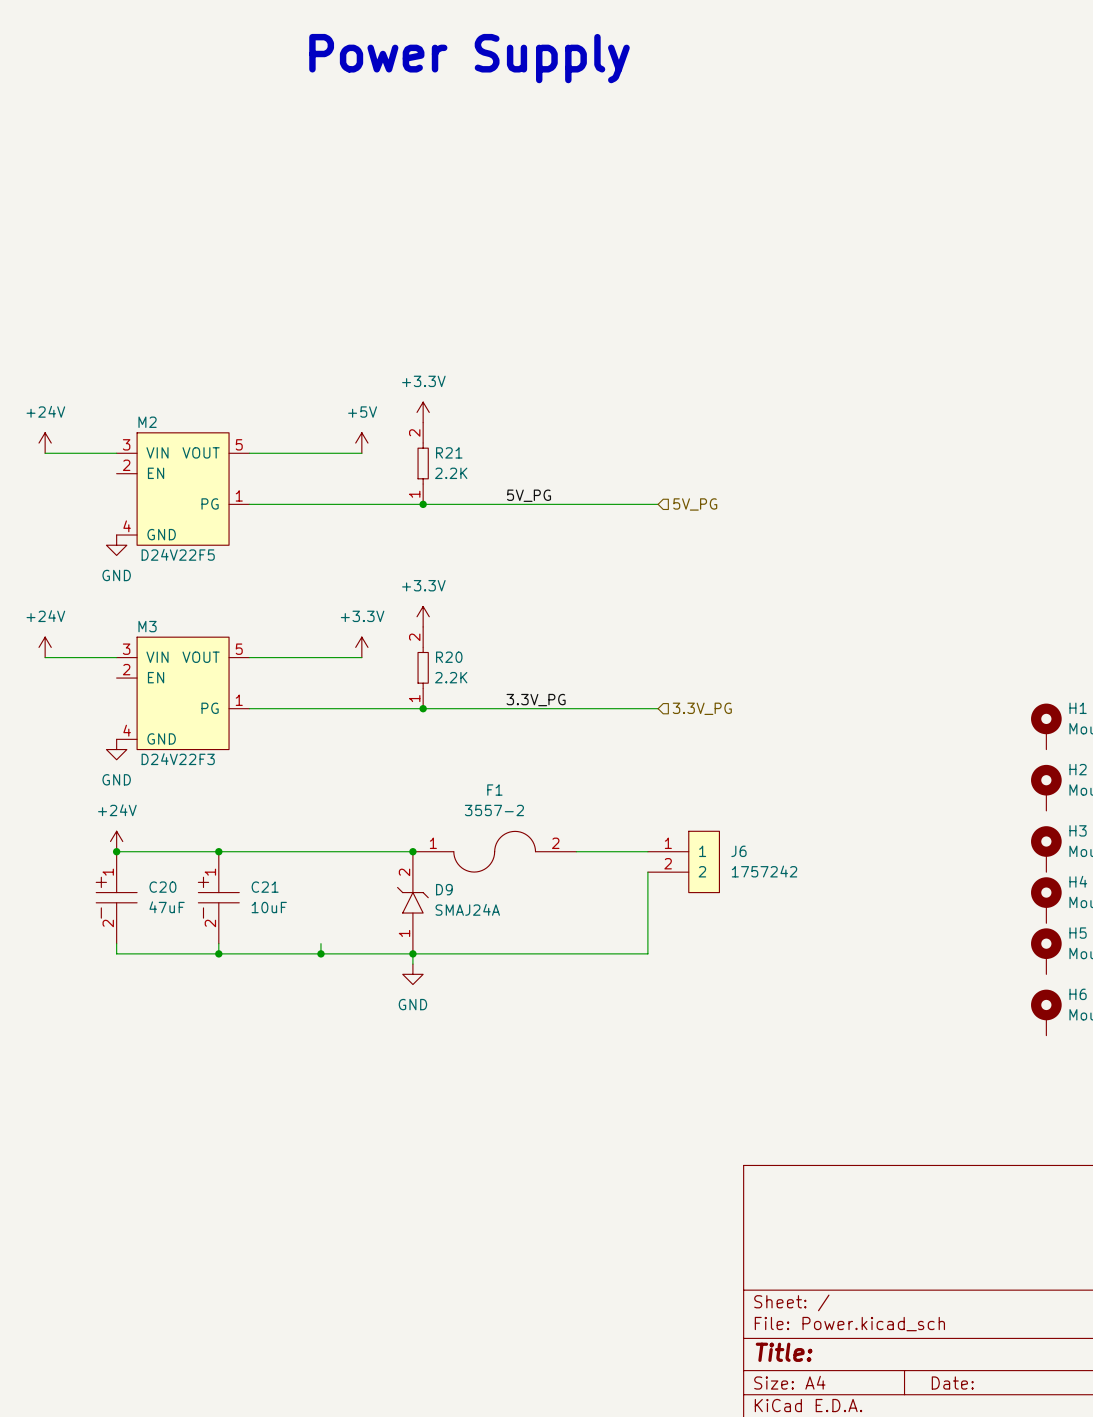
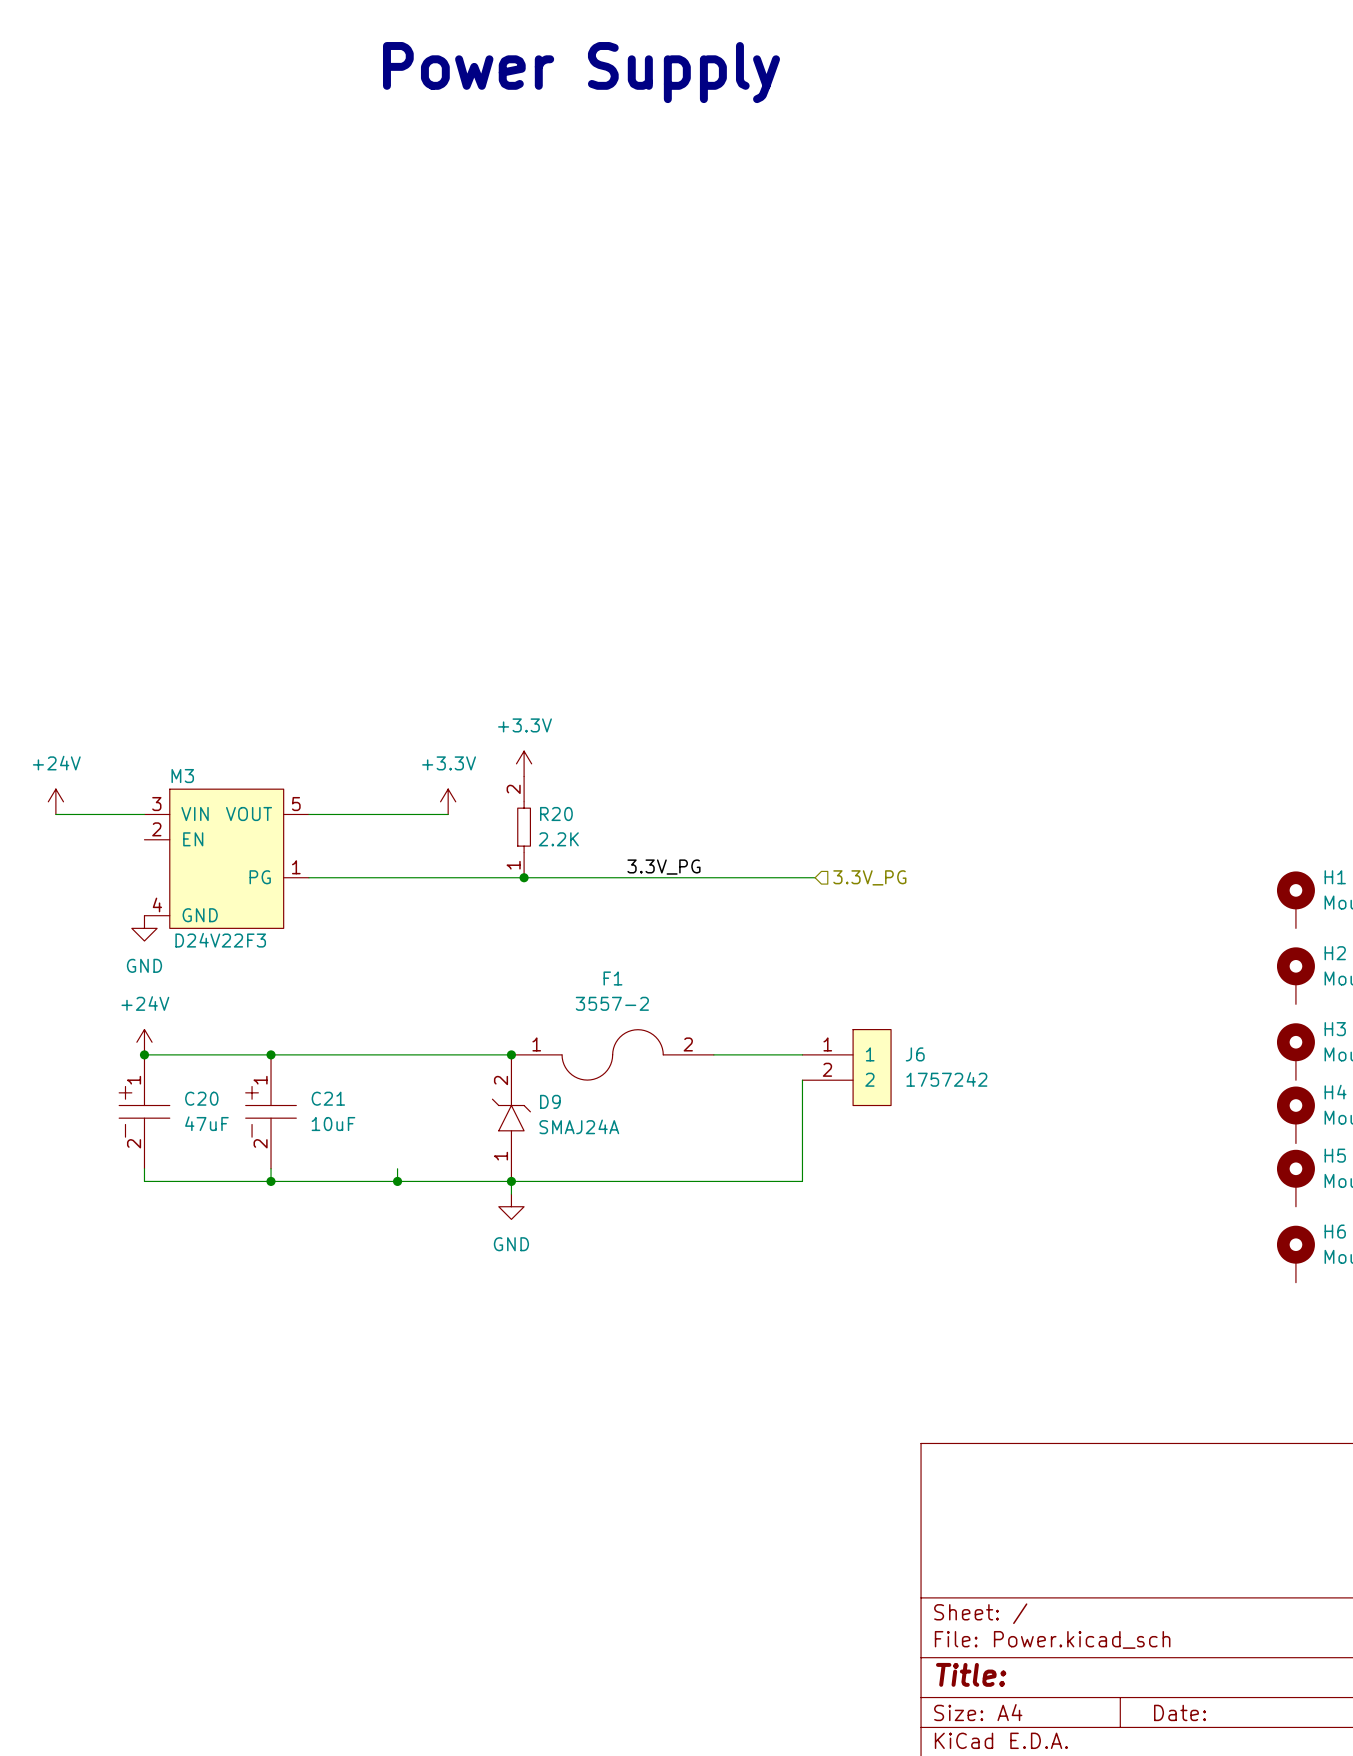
power symbol: +3.3V (423, 412) -> none
power symbol: +24V (45, 443) -> none
power symbol: +5V (361, 443) -> none
wire: (45, 453) (116, 453) -> none
wire: (249, 453) (361, 453) -> none
R21: (423, 463) -> none
M2: (183, 489) -> none
label: 5V_PG (529, 495) -> none
wire: (249, 504) (658, 504) -> none
junction: (423, 504) -> none
hierarchical label: 5V_PG (695, 504) -> none
power symbol: GND (116, 545) -> none

